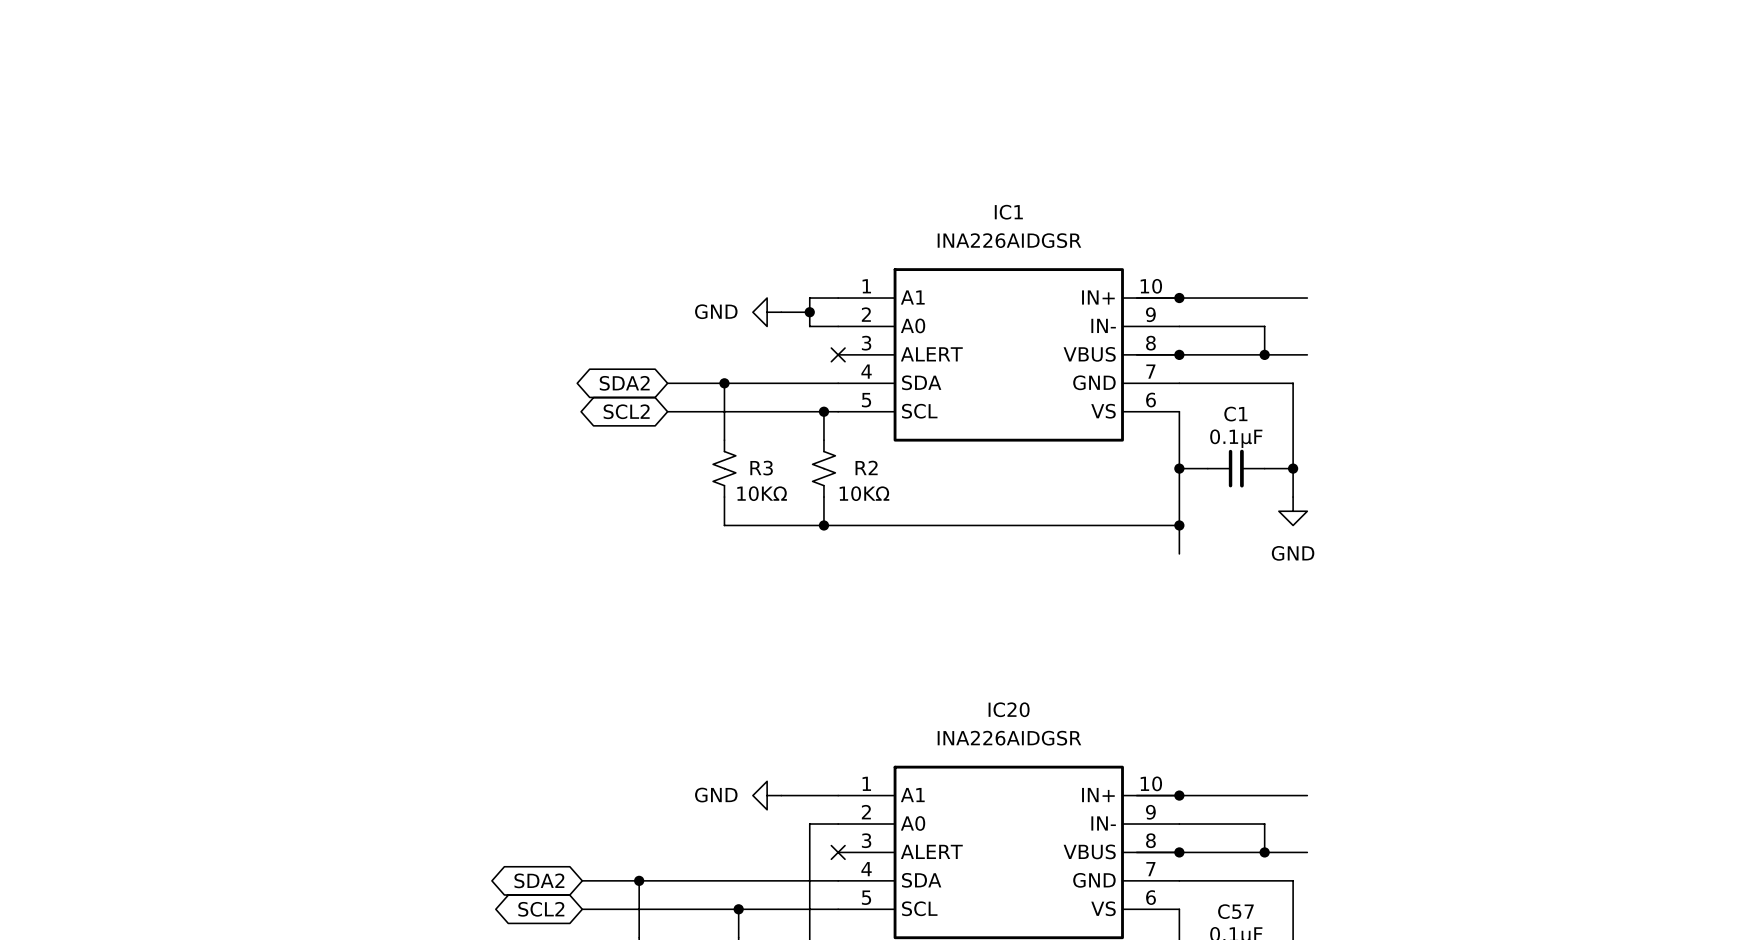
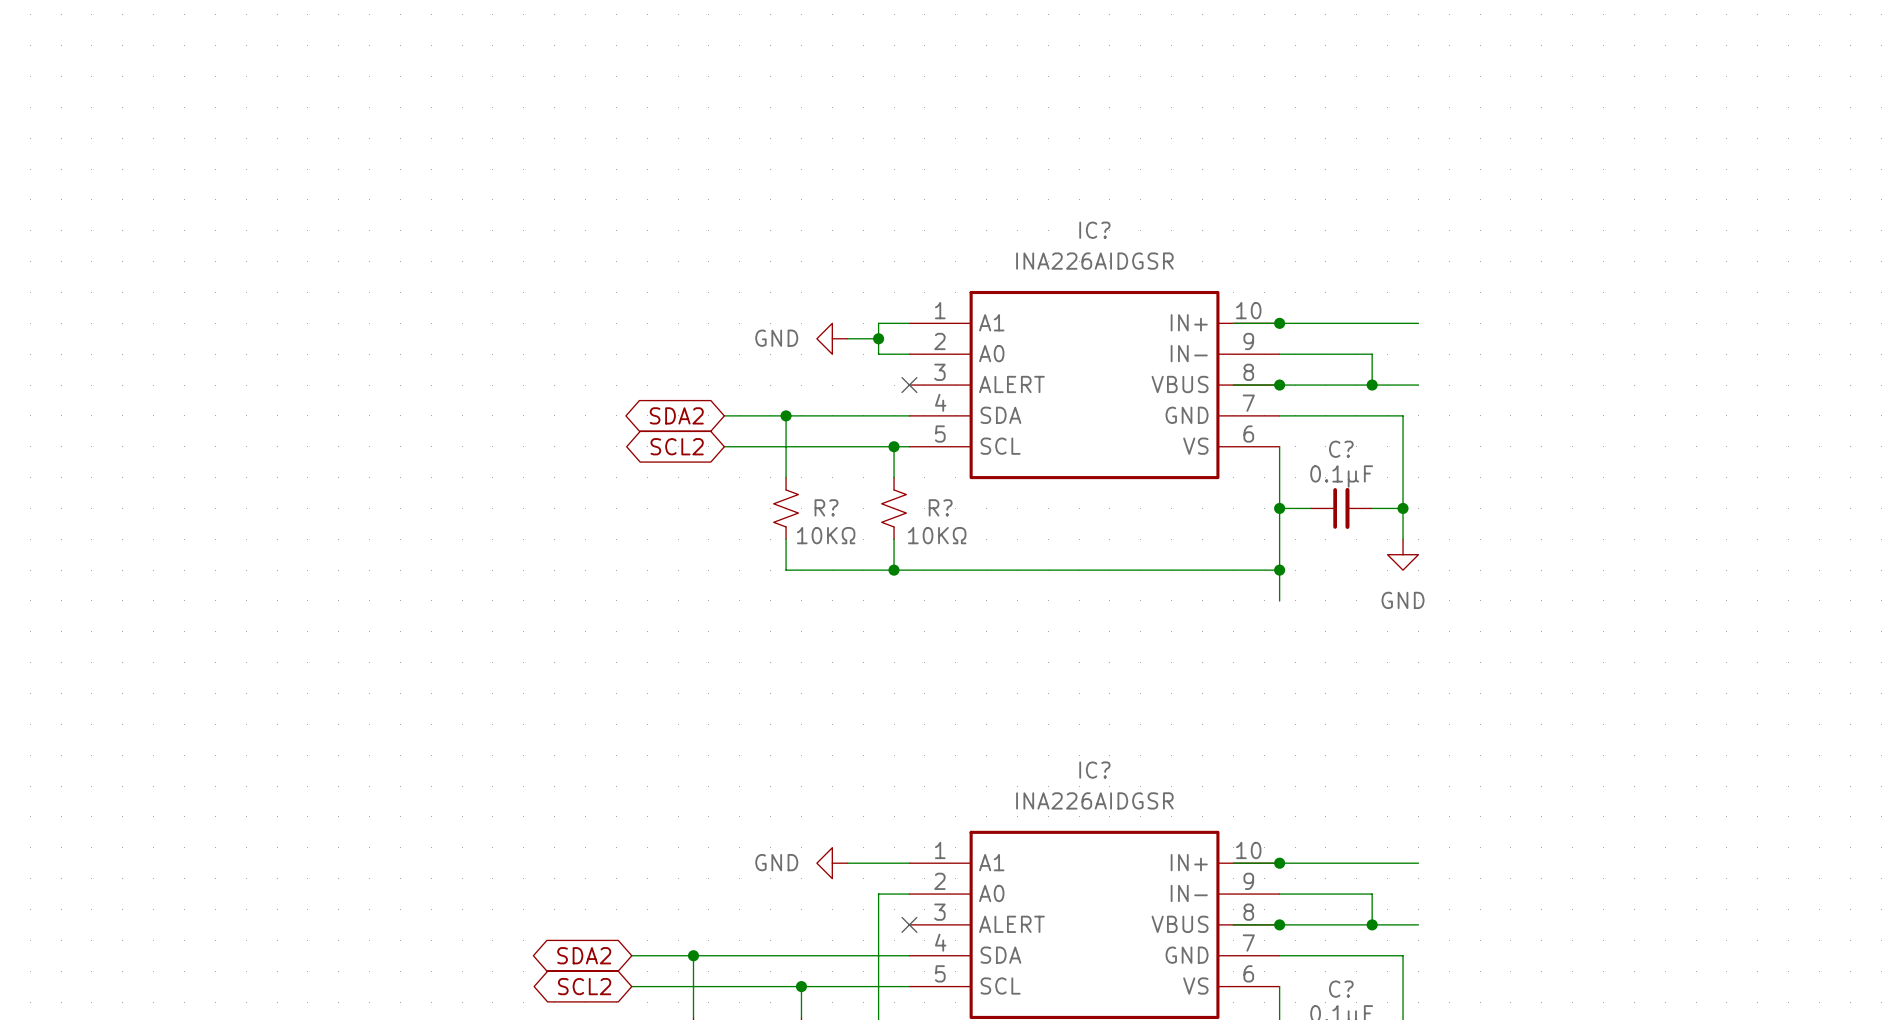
IC1 name: IC1 (1008, 212) -> IC? (1094, 230)
C1 name: C1 (1235, 414) -> C? (1341, 449)
R2 name: R2 (866, 467) -> R? (940, 507)
R3 name: R3 (761, 468) -> R? (826, 507)
IC20 name: IC20 (1009, 709) -> IC? (1094, 770)
C57 name: C57 (1235, 911) -> C? (1341, 989)

